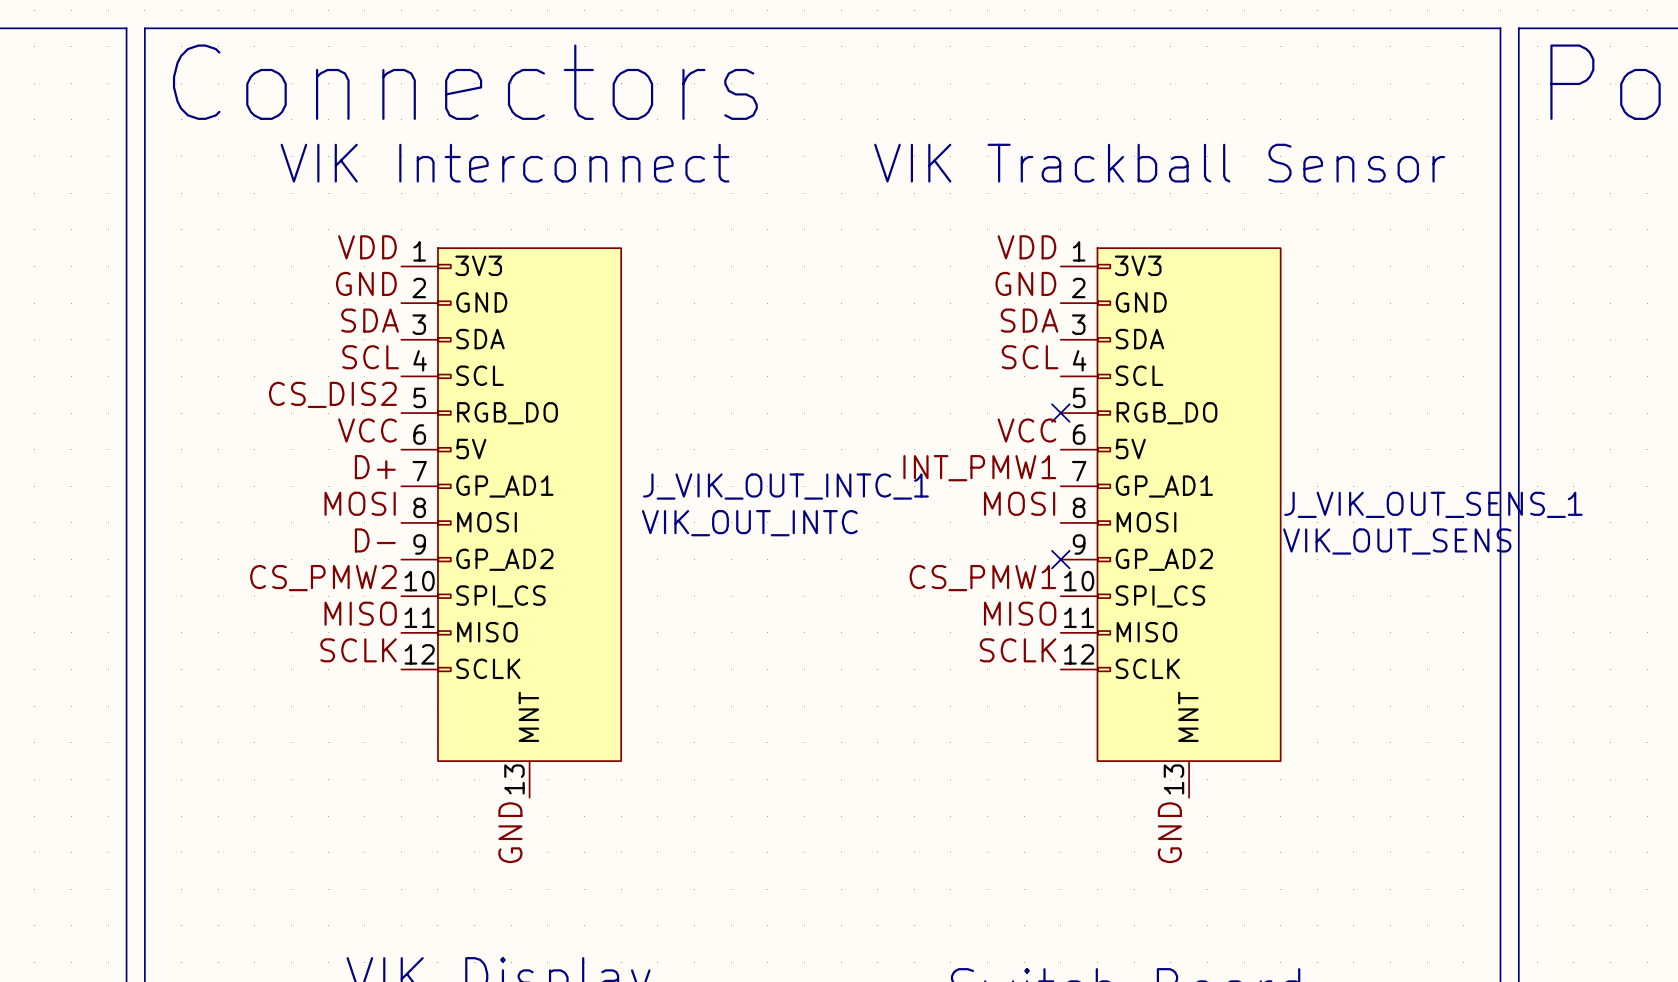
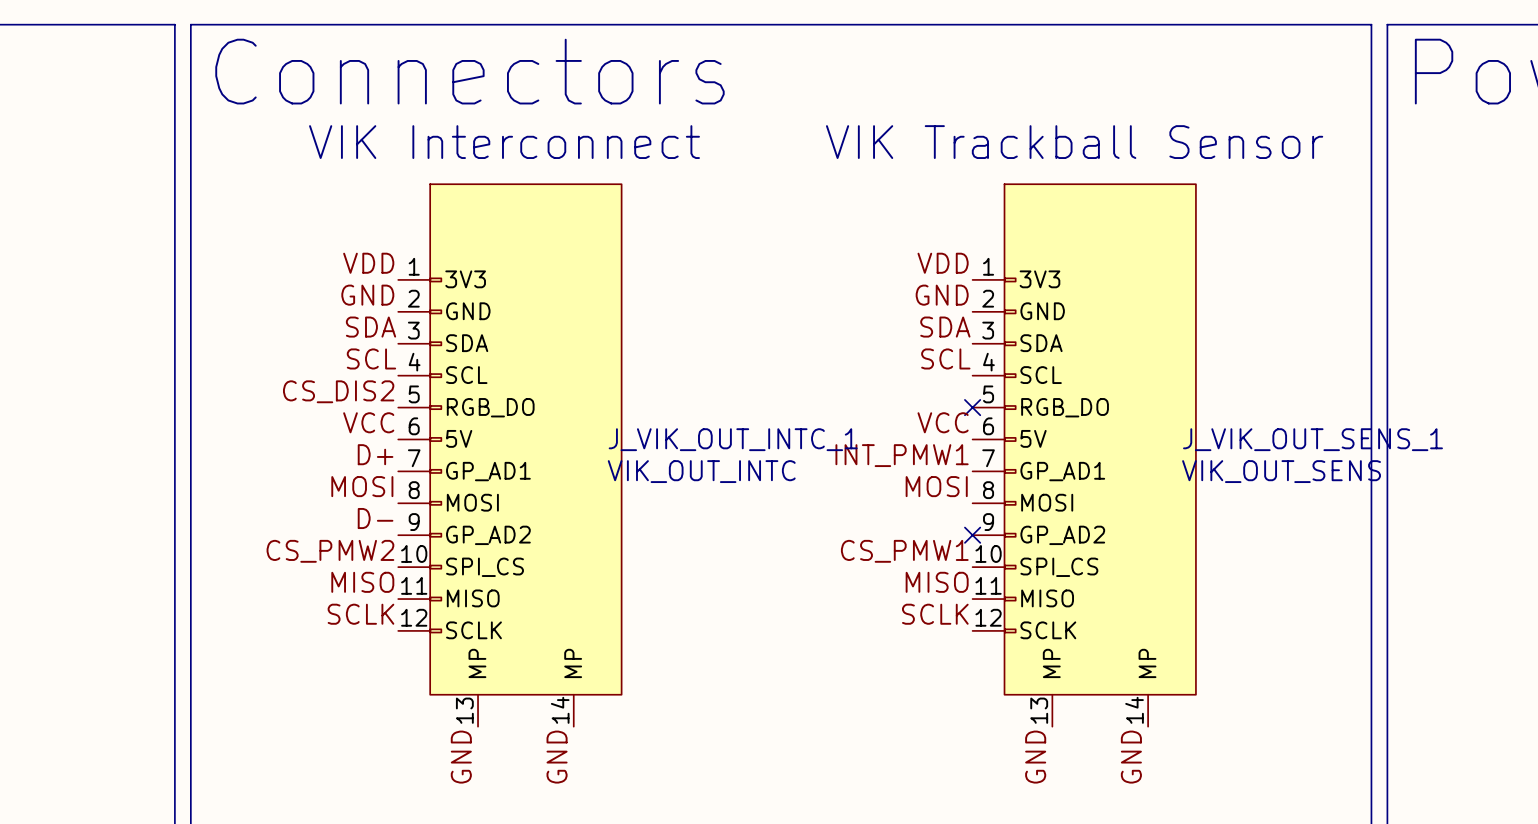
label position: VDD (367, 247) -> VDD (368, 263)
label position: VDD (1026, 247) -> VDD (943, 263)
J_VIK_OUT_INTC_1 symbol: [401, 248, 622, 798] -> [398, 184, 622, 727]
J_VIK_OUT_SENS_1 symbol: [1060, 248, 1281, 798] -> [972, 184, 1196, 727]
label position: GND (366, 283) -> GND (367, 295)
label position: GND (1025, 283) -> GND (942, 295)
label position: SDA (370, 320) -> SDA (371, 327)
label position: SDA (1029, 320) -> SDA (945, 327)
label position: SCL (370, 357) -> SCL (371, 358)
label position: SCL (1030, 357) -> SCL (945, 358)
label position: CS_DIS2 (332, 394) -> CS_DIS2 (338, 391)
no-connect mark: (1060, 413) -> none
label position: VCC (367, 430) -> VCC (368, 422)
label position: VCC (1026, 430) -> VCC (943, 422)
label position: D+ (375, 467) -> D+ (375, 454)
no-connect mark: none -> (972, 407)
label position: INT_PMW1 (979, 468) -> INT_PMW1 (902, 455)
label position: MOSI (360, 503) -> MOSI (362, 486)
label position: MOSI (1019, 503) -> MOSI (936, 486)
label position: D- (375, 540) -> D- (375, 518)
no-connect mark: (1060, 559) -> none
label position: CS_PMW2 (323, 578) -> CS_PMW2 (330, 551)
label position: CS_PMW1 (982, 578) -> CS_PMW1 (904, 551)
label position: MISO (360, 613) -> MISO (362, 582)
label position: MISO (1020, 613) -> MISO (937, 582)
no-connect mark: none -> (972, 535)
label position: SCLK (358, 650) -> SCLK (360, 614)
label position: SCLK (1018, 650) -> SCLK (935, 614)
label: GND (510, 832) -> none
label: GND (1169, 832) -> none
label: none -> GND (461, 757)
label: none -> GND (557, 757)
label: none -> GND (1035, 757)
label: none -> GND (1131, 757)

